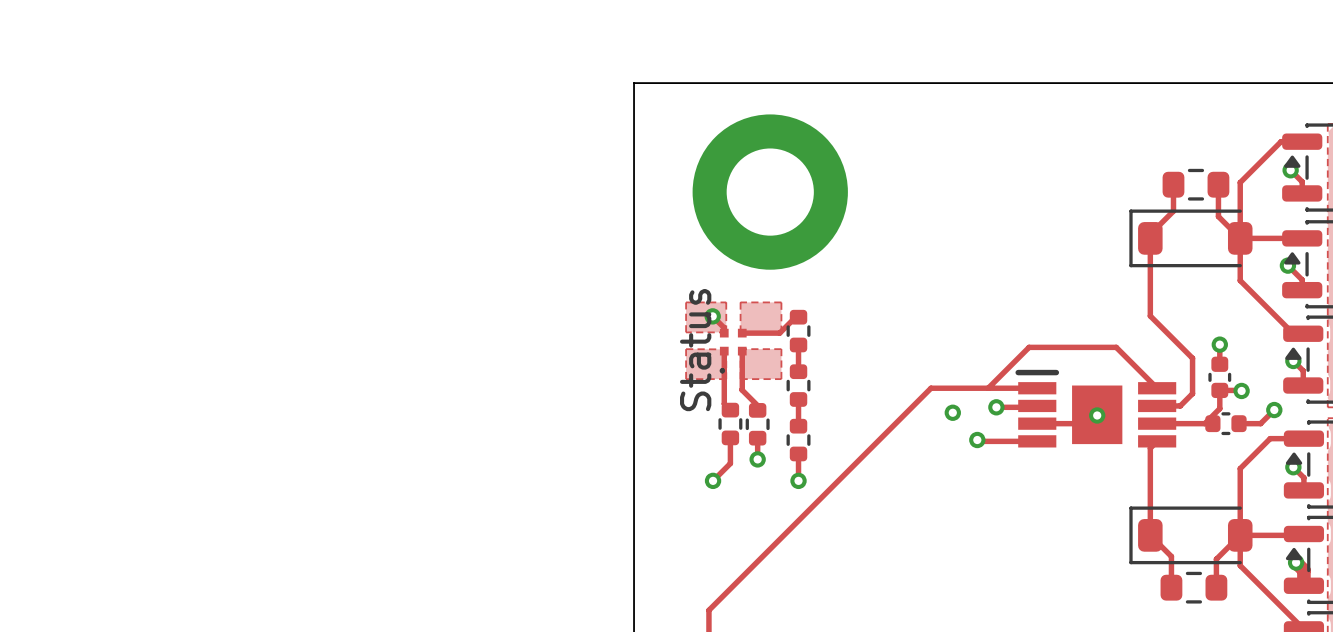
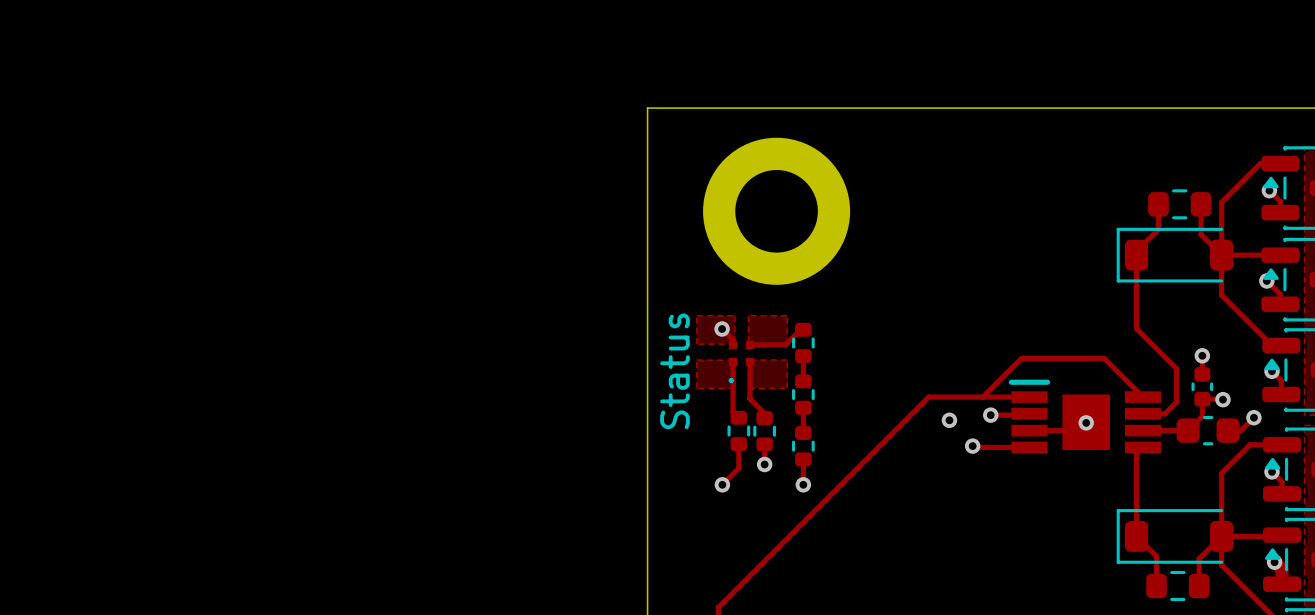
part text position: Status (695, 350) -> Status (674, 371)
part footprint: [1205, 412, 1247, 436] -> [1176, 415, 1240, 446]

